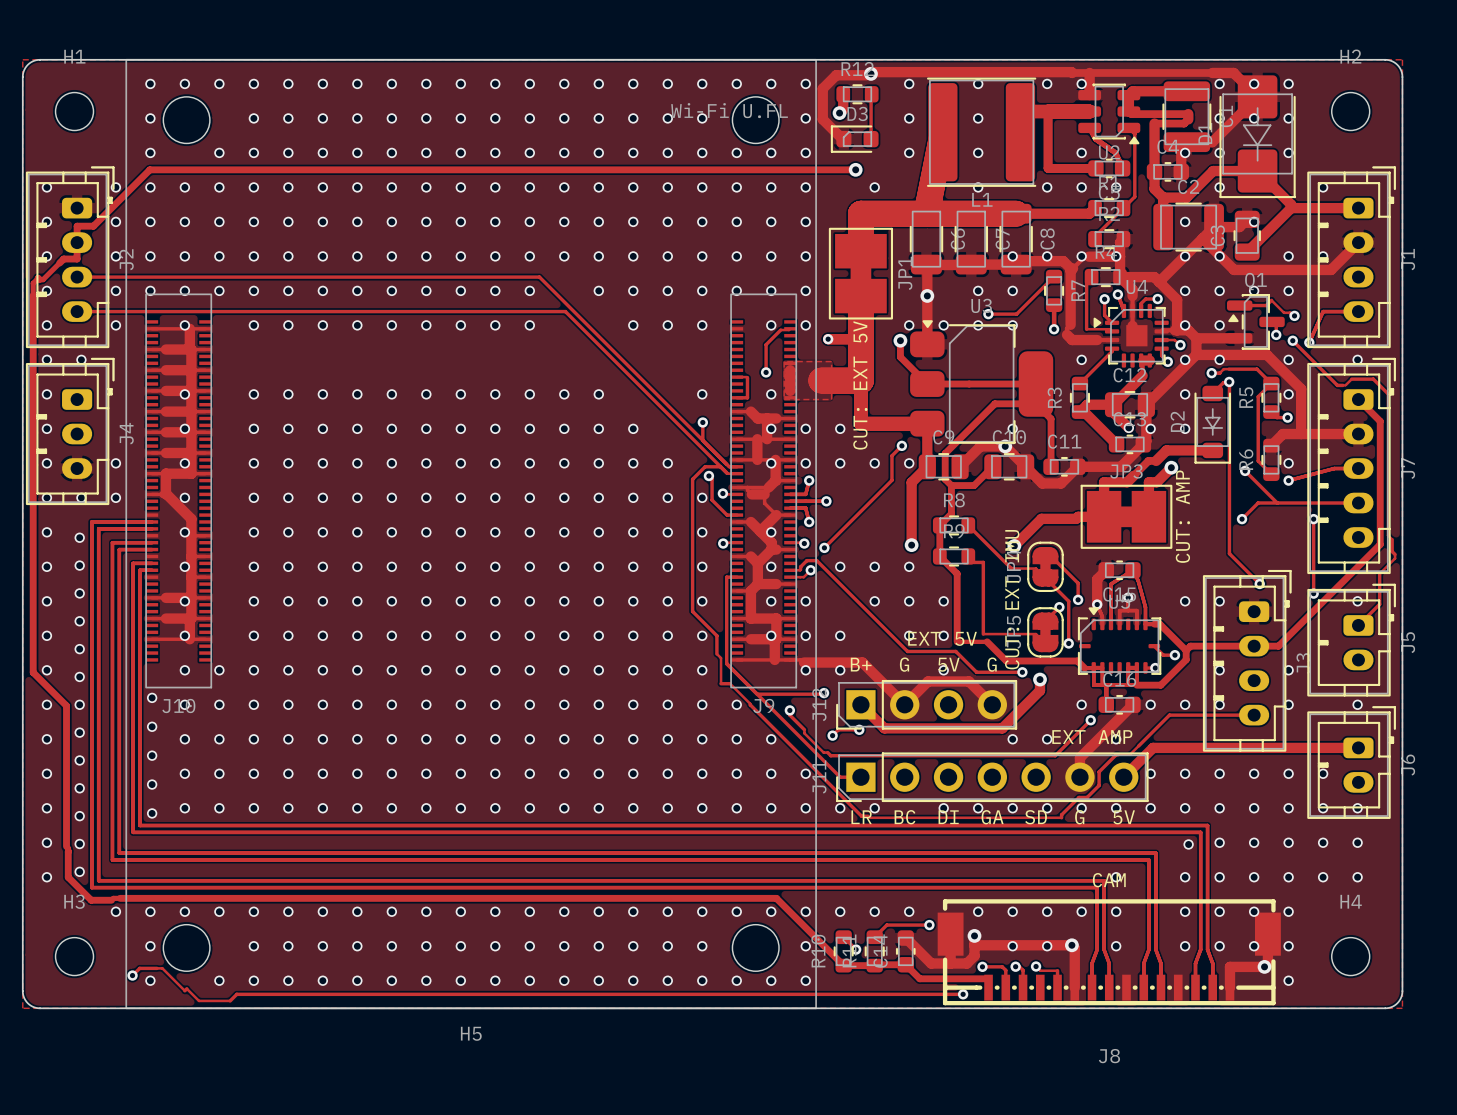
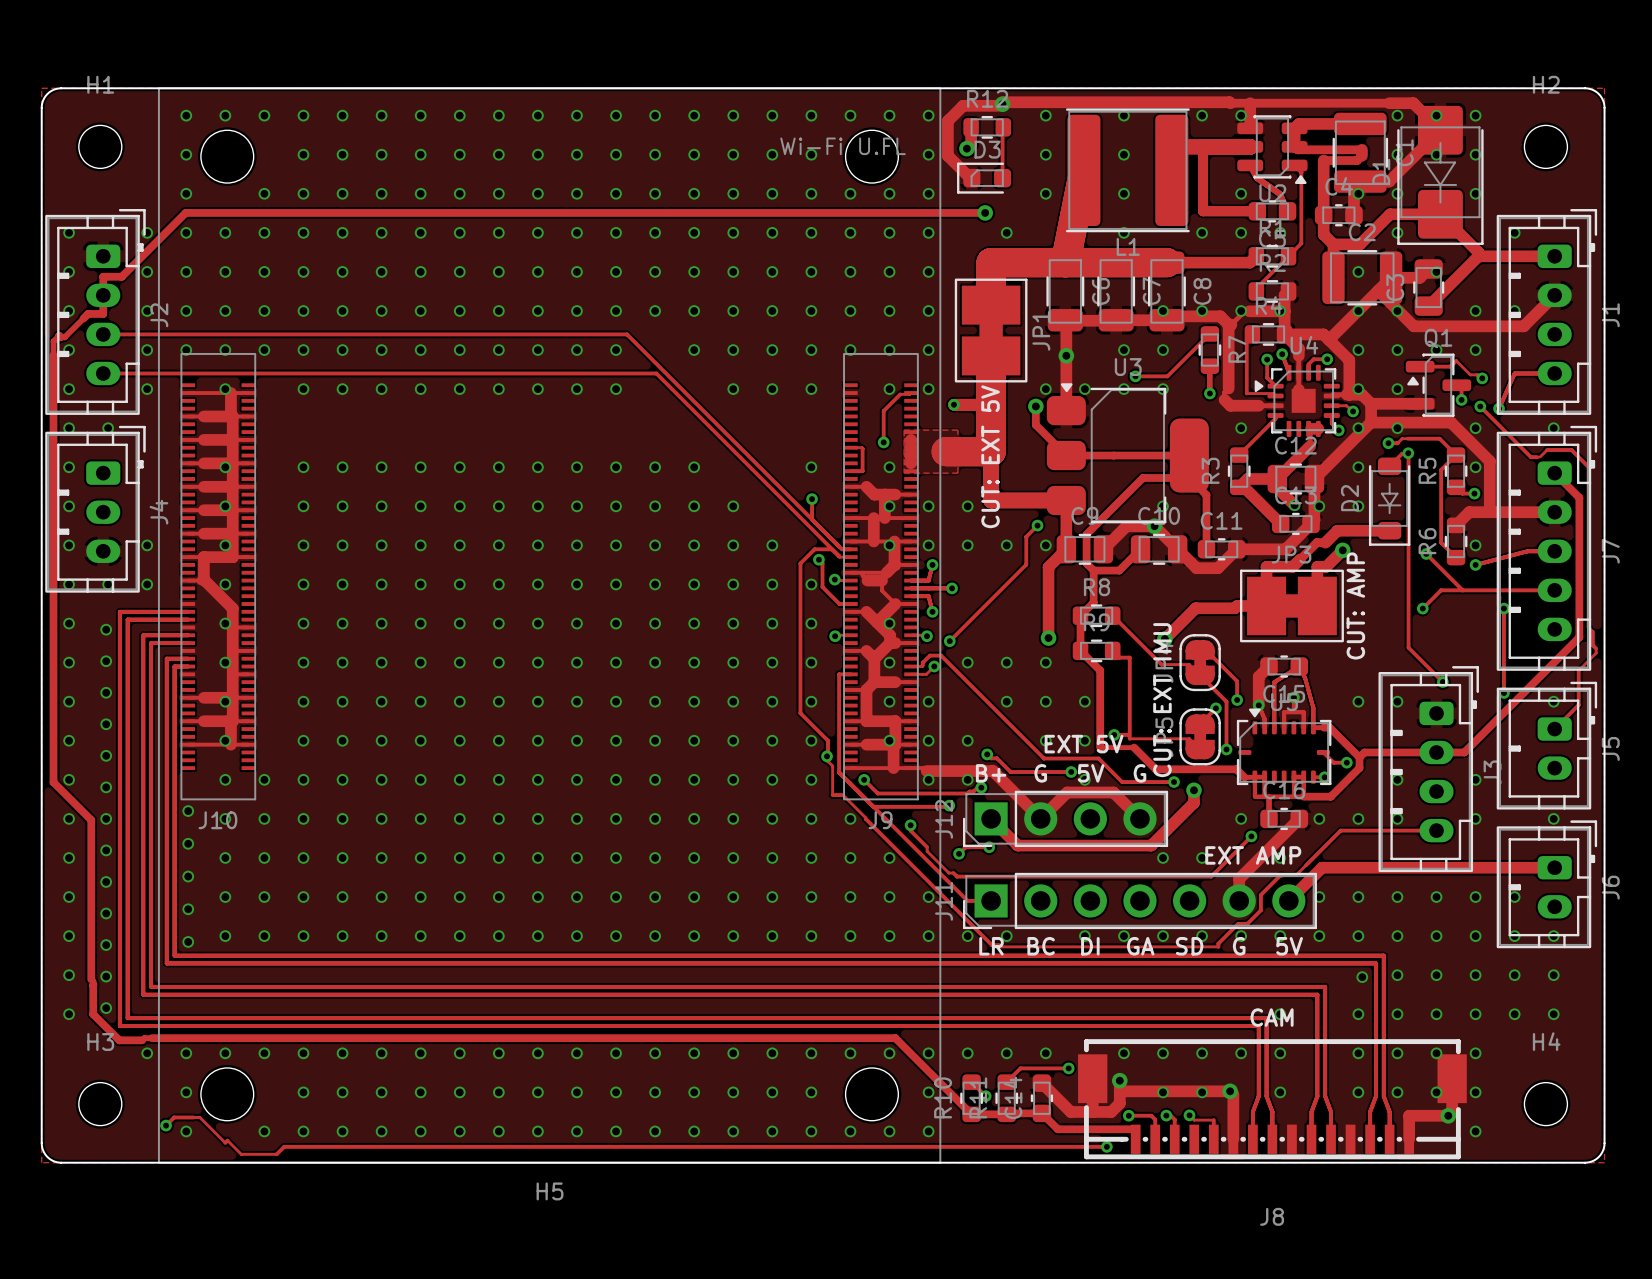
track: none -> (1114, 734) (1127, 734)
via: none -> (1114, 734)
track: none -> (987, 754) (991, 758) (996, 758) (1010, 772) (1071, 772)
via: none -> (987, 754)
via: none -> (827, 756)
via: none -> (1071, 772)
track: none -> (864, 779) (877, 793) (967, 793) (977, 787) (981, 787)
via: none -> (864, 779)
via: none -> (981, 787)

